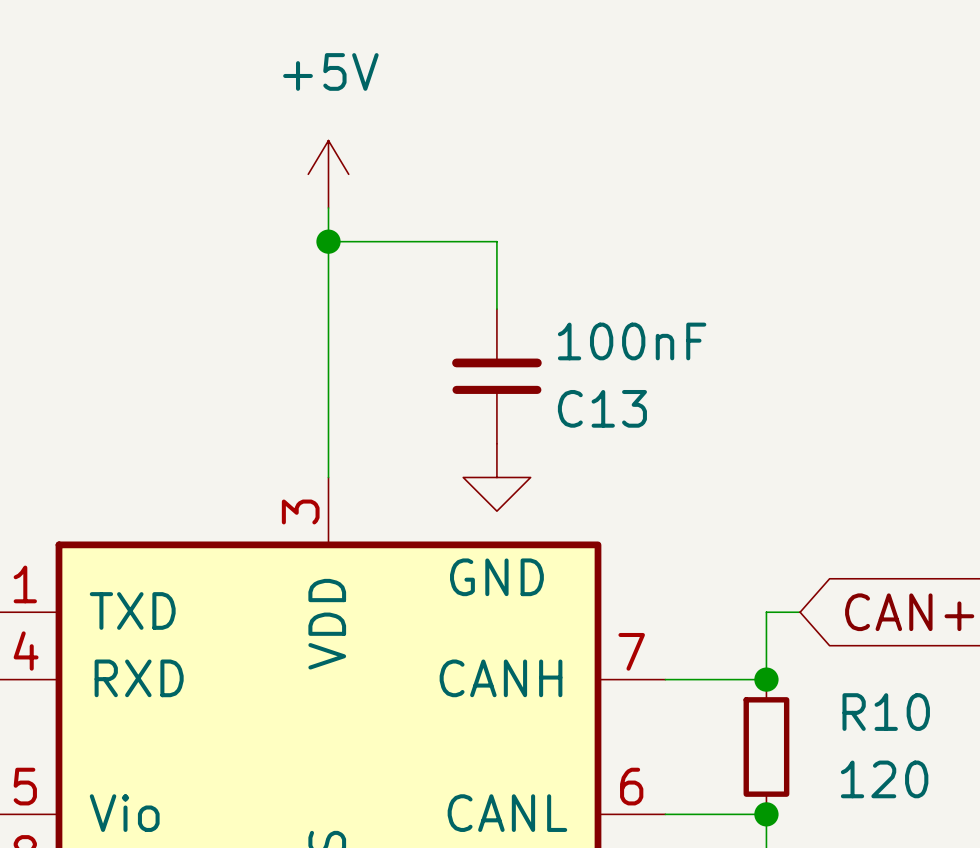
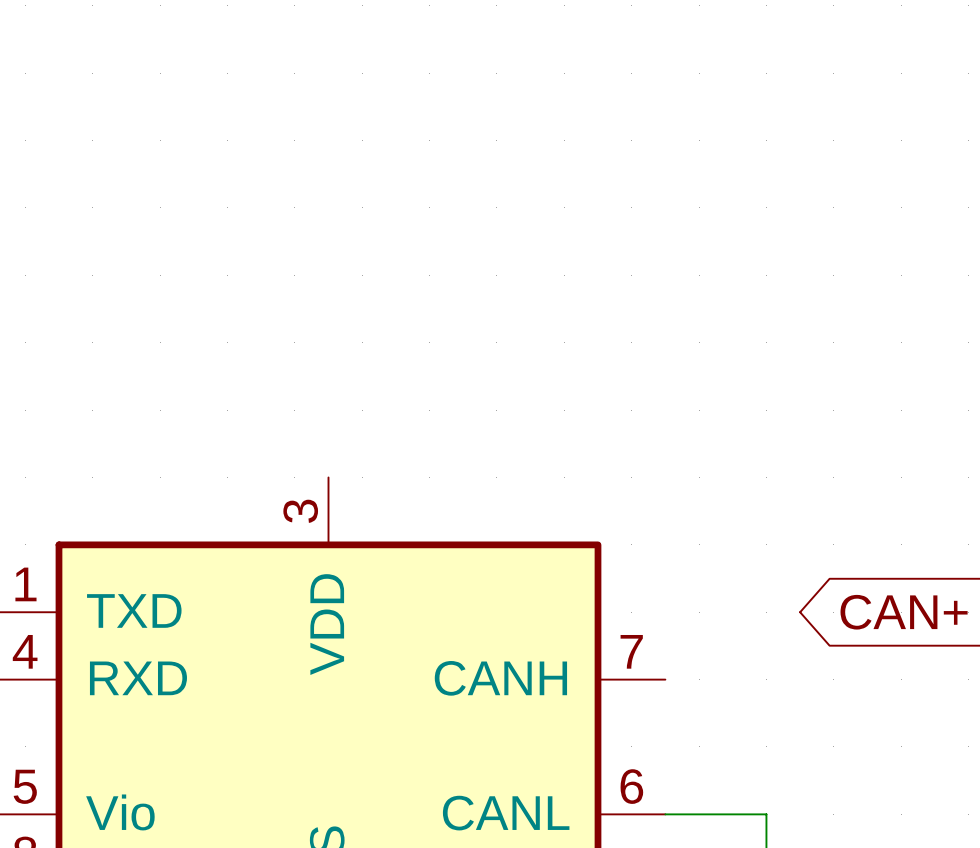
power symbol: +5V (328, 174) -> none
wire: (328, 207) (328, 477) -> none
wire: (328, 241) (496, 241) (496, 309) -> none
junction: (328, 241) -> none
C13: 100nF (496, 376) -> none
power symbol: GND (496, 477) -> none
wire: (800, 612) (766, 612) (766, 679) (665, 679) -> none
junction: (766, 679) -> none
R10: 120 (766, 746) -> none
junction: (766, 814) -> none

